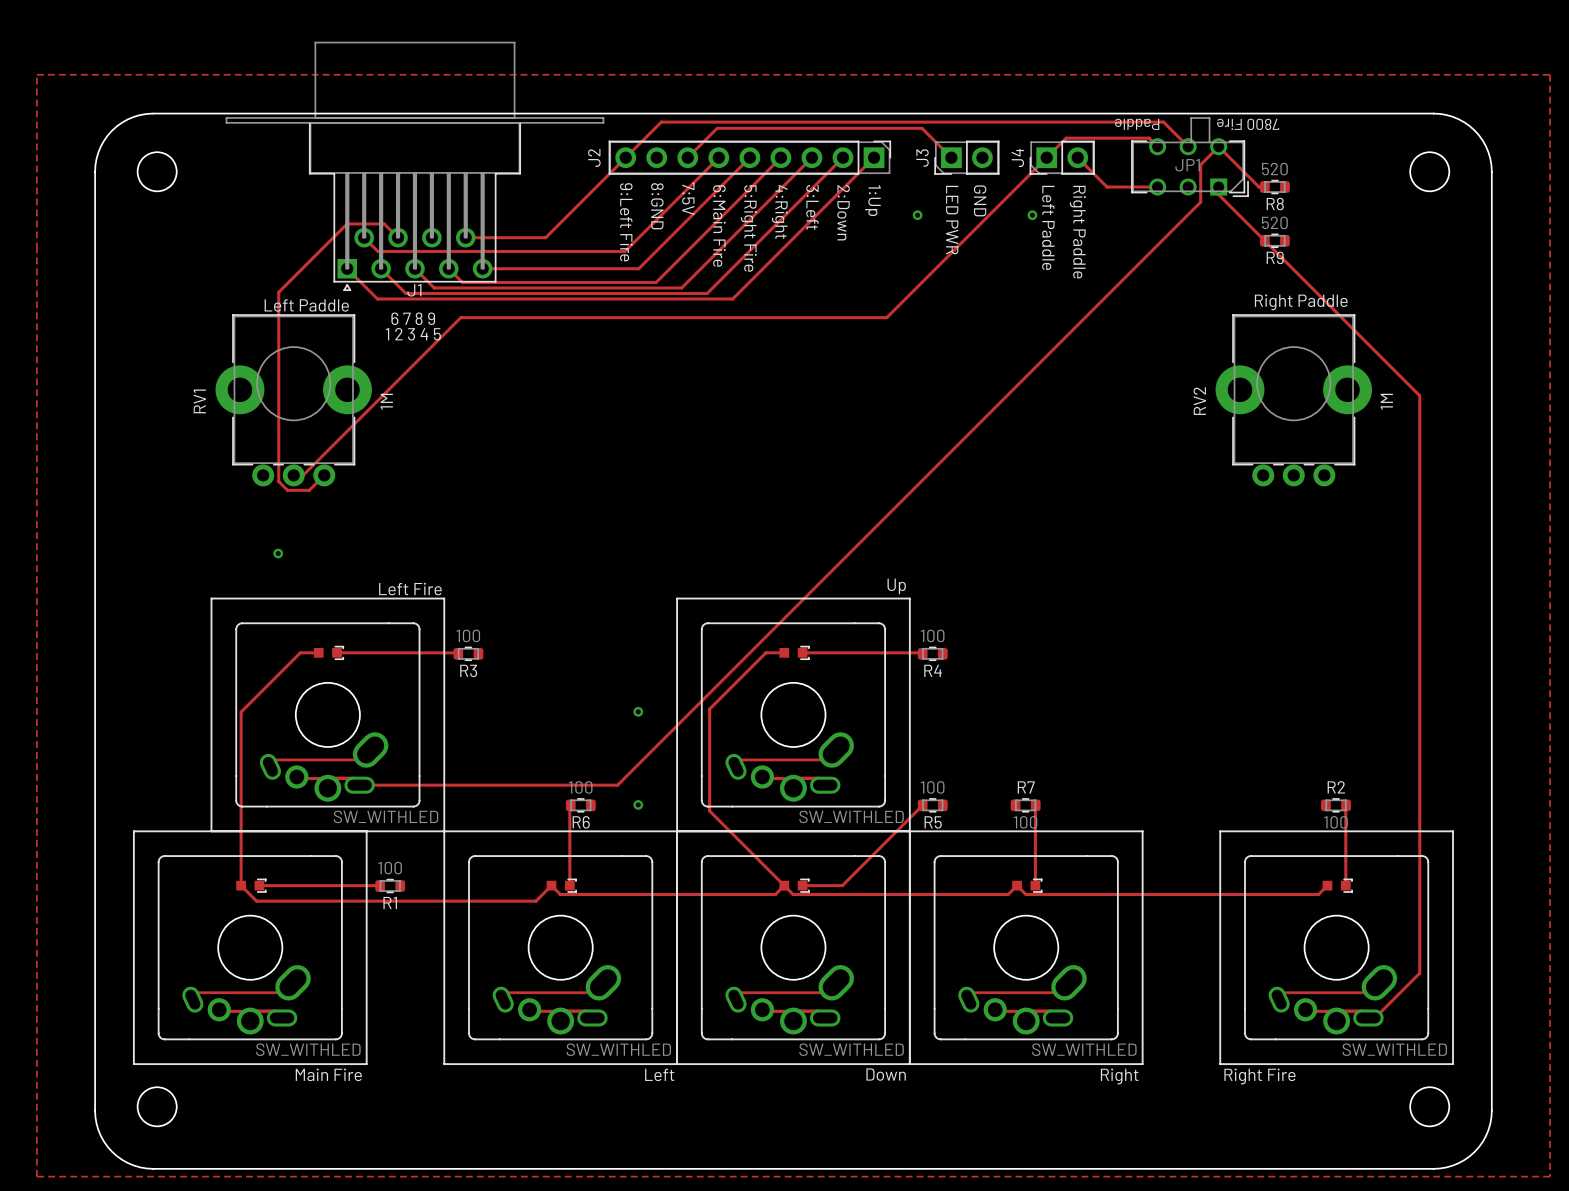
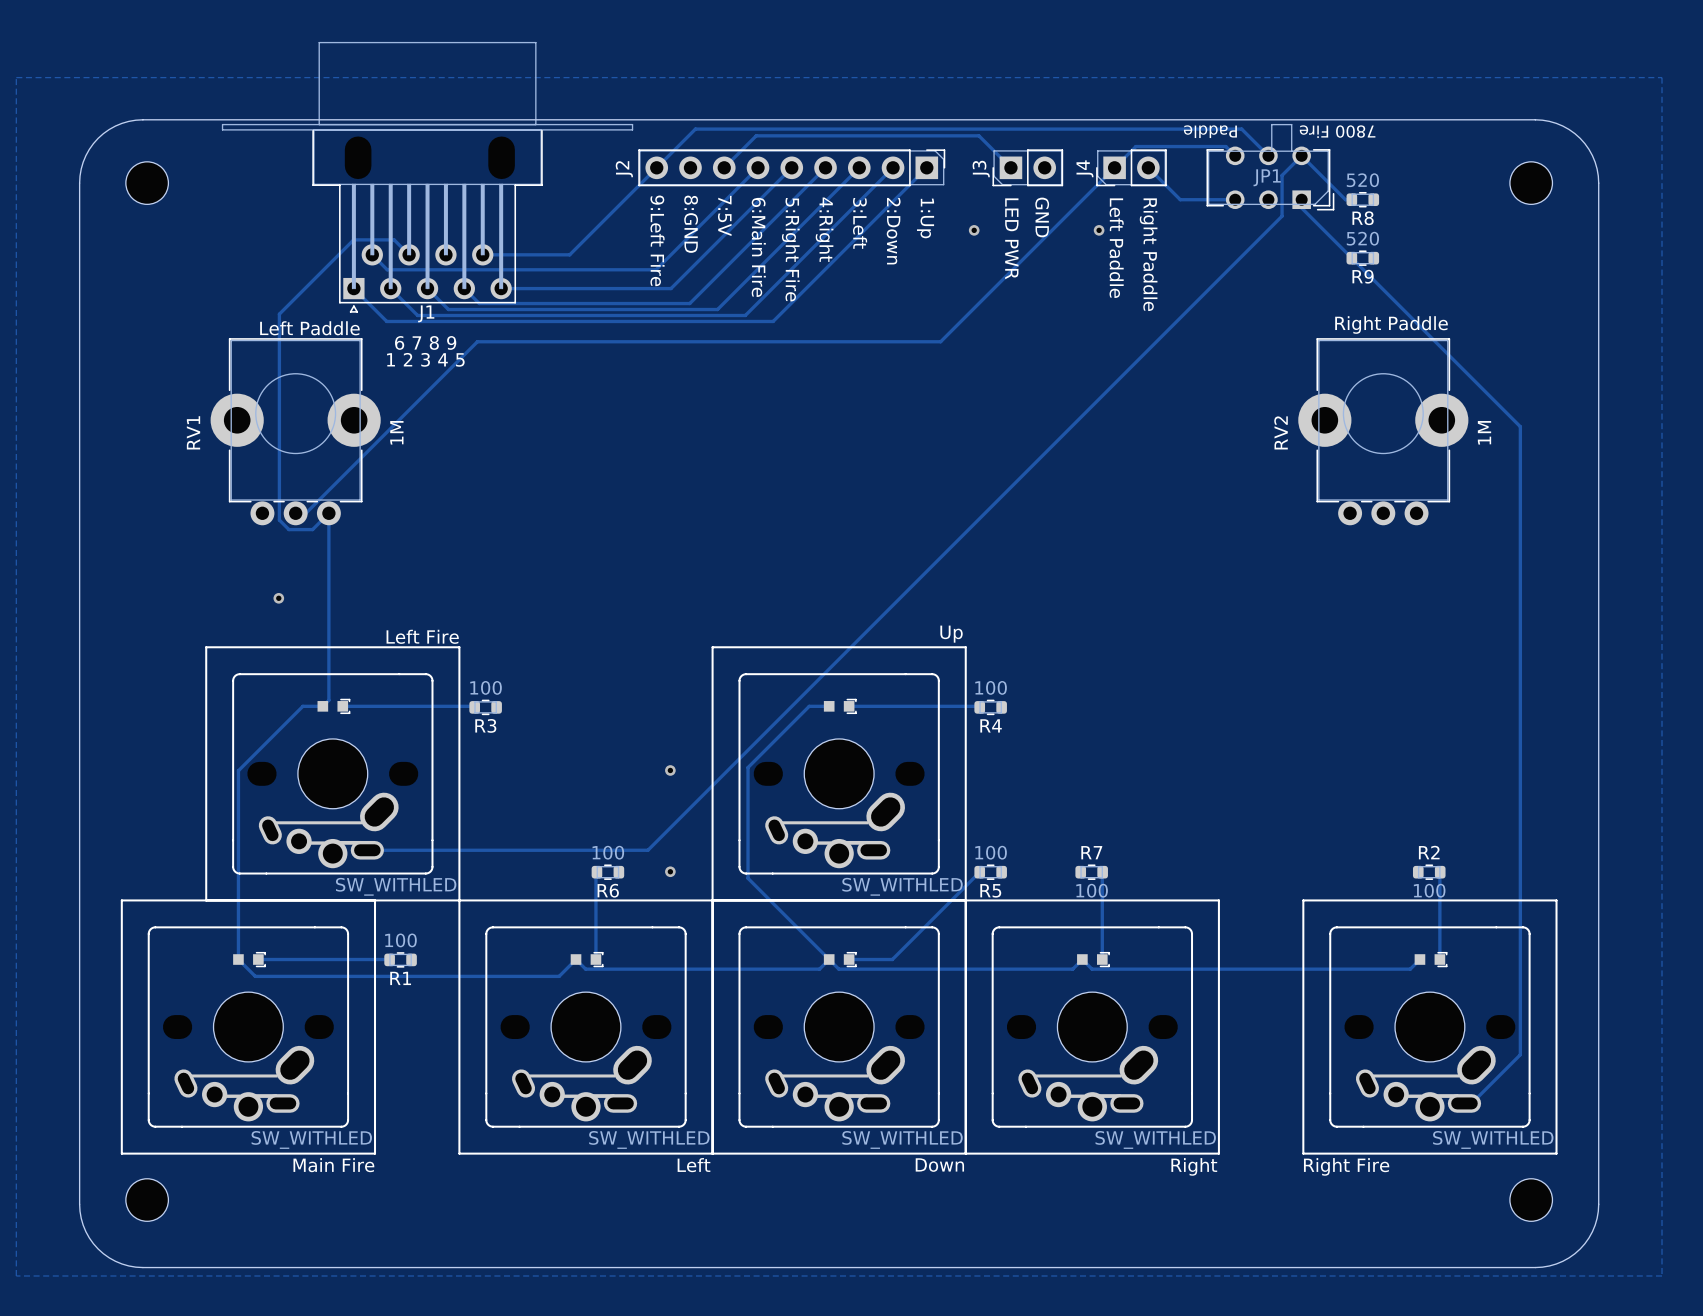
track: none -> (328, 513) (328, 700) (322, 706)

